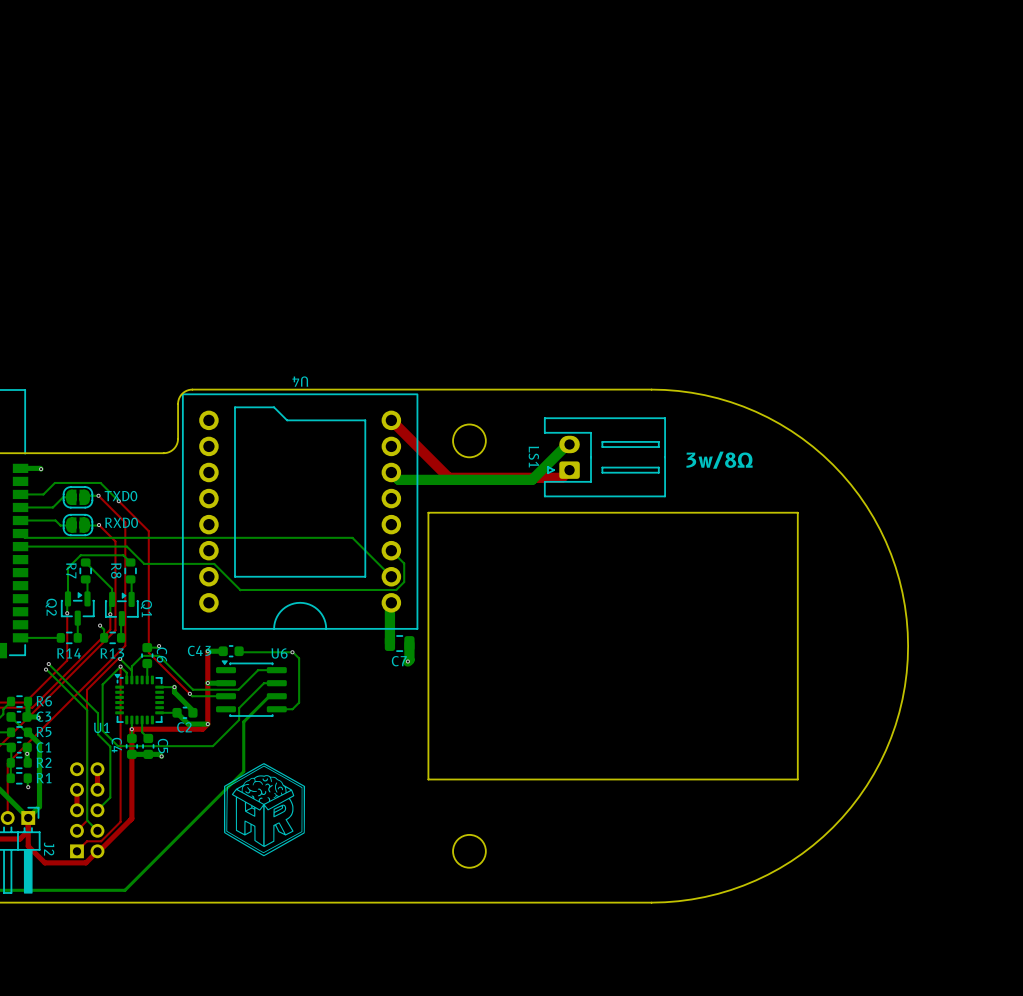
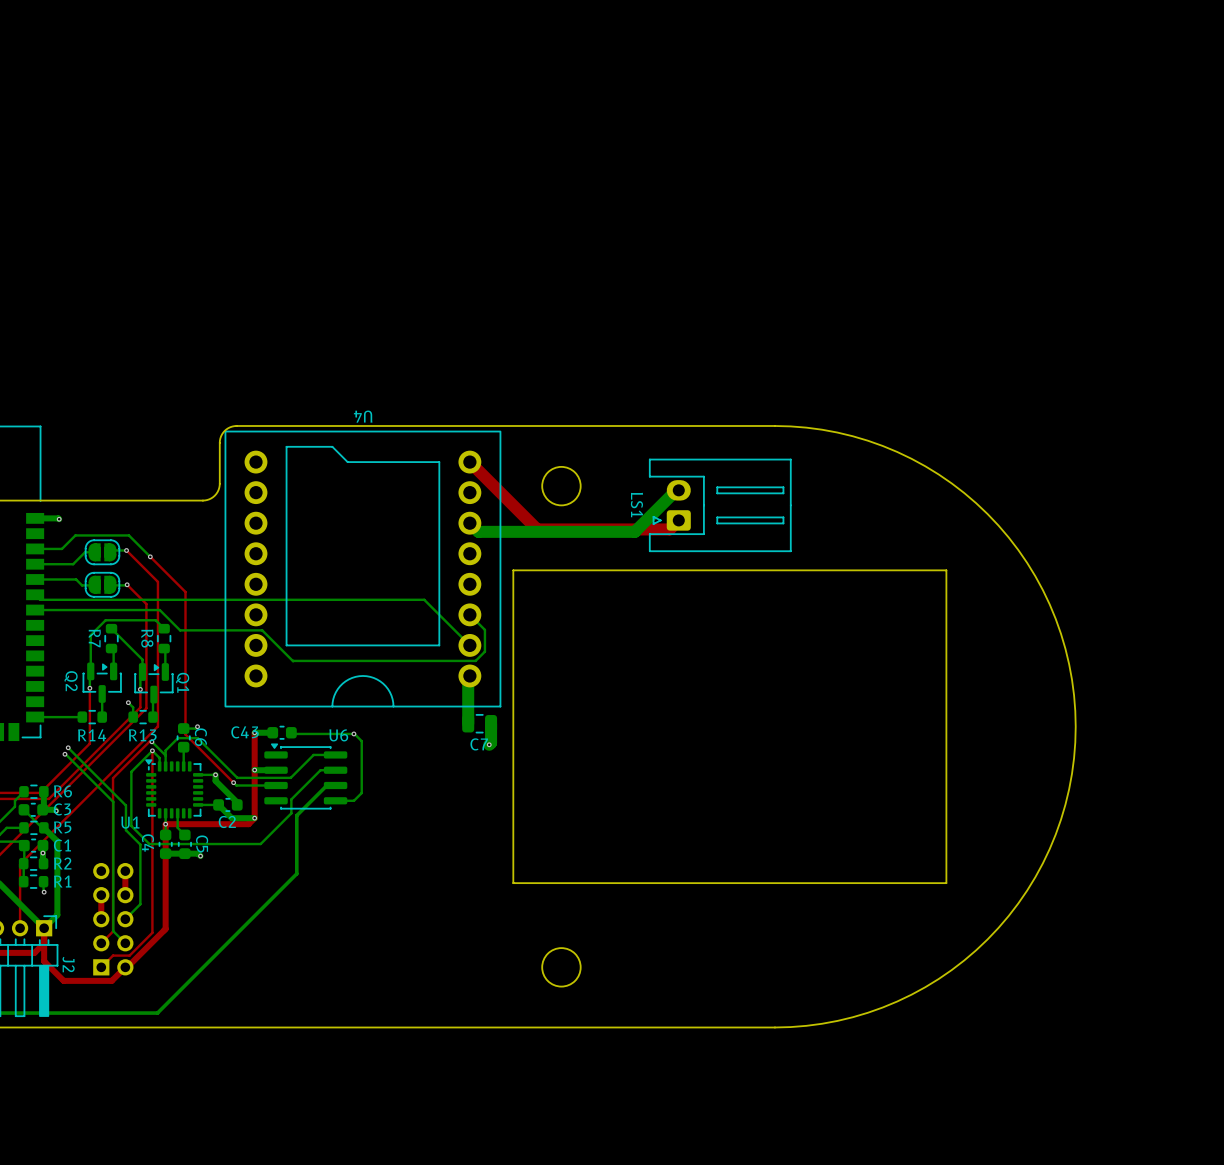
text: 3w/8Ω (719, 460) -> none
text: TXD0 (121, 496) -> none
text: RXD0 (121, 522) -> none
drawing: [223, 763, 306, 857] -> none

